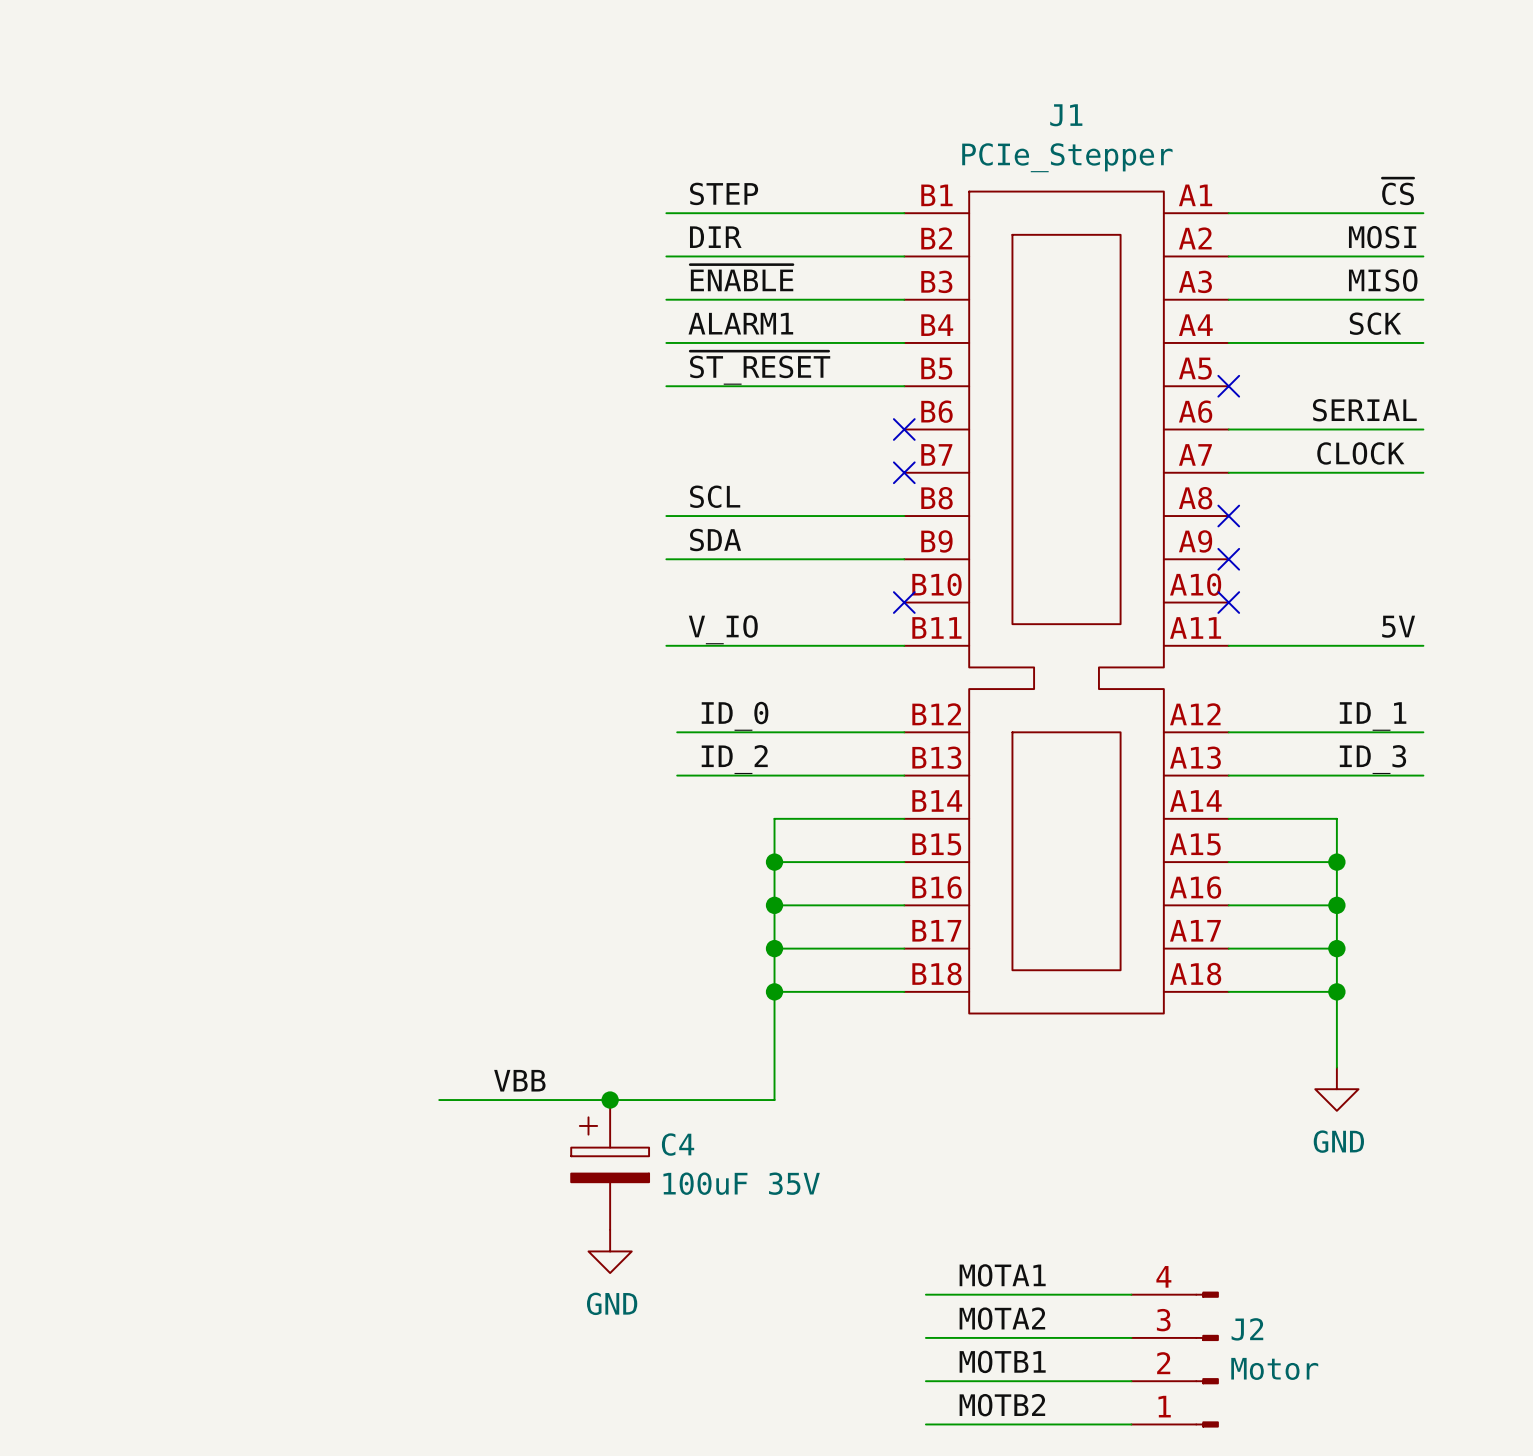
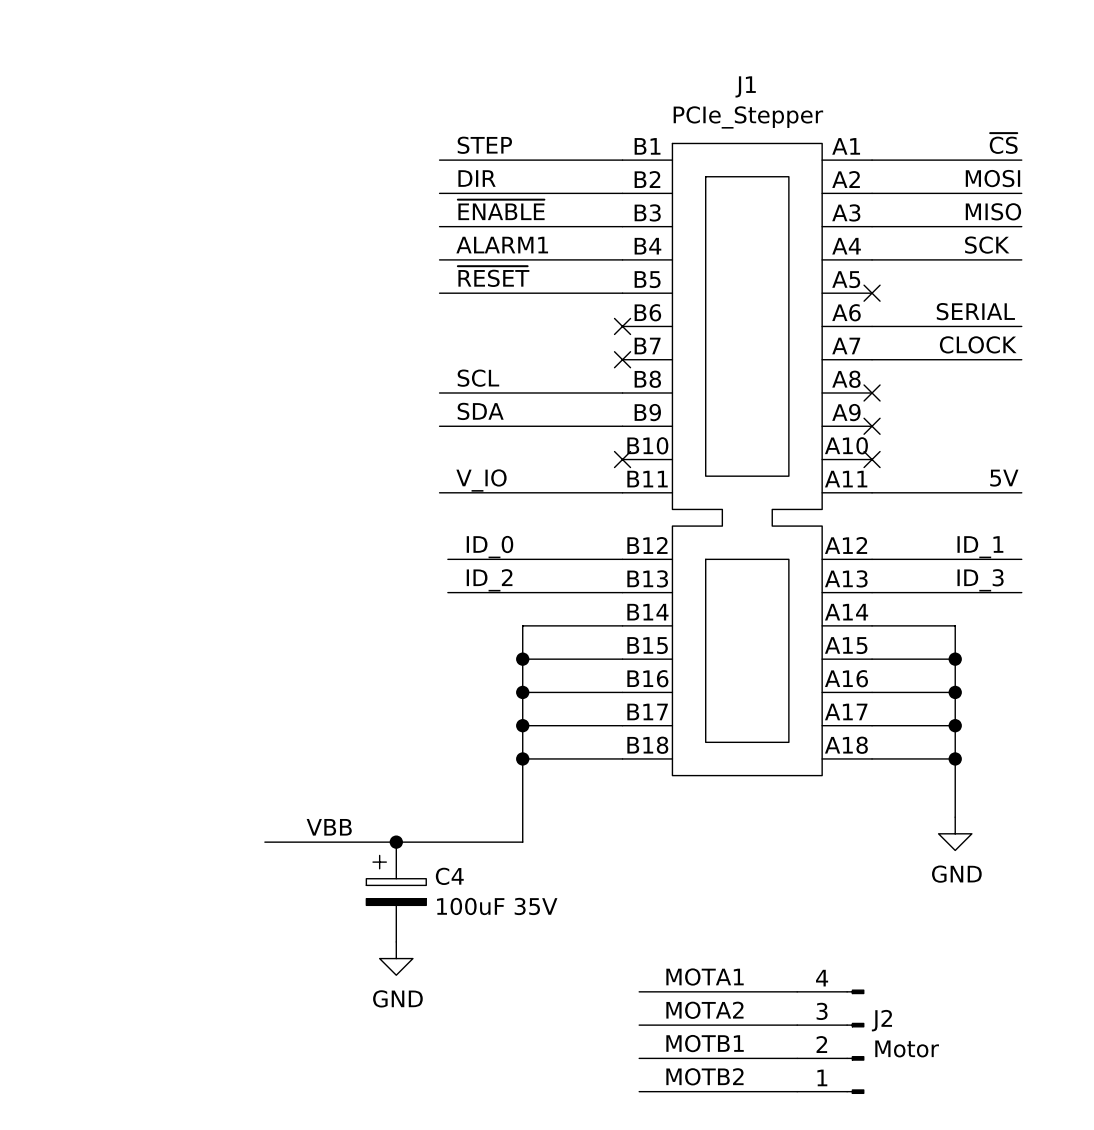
label: ~{ST_RESET} (760, 367) -> ~{RESET} (493, 276)

